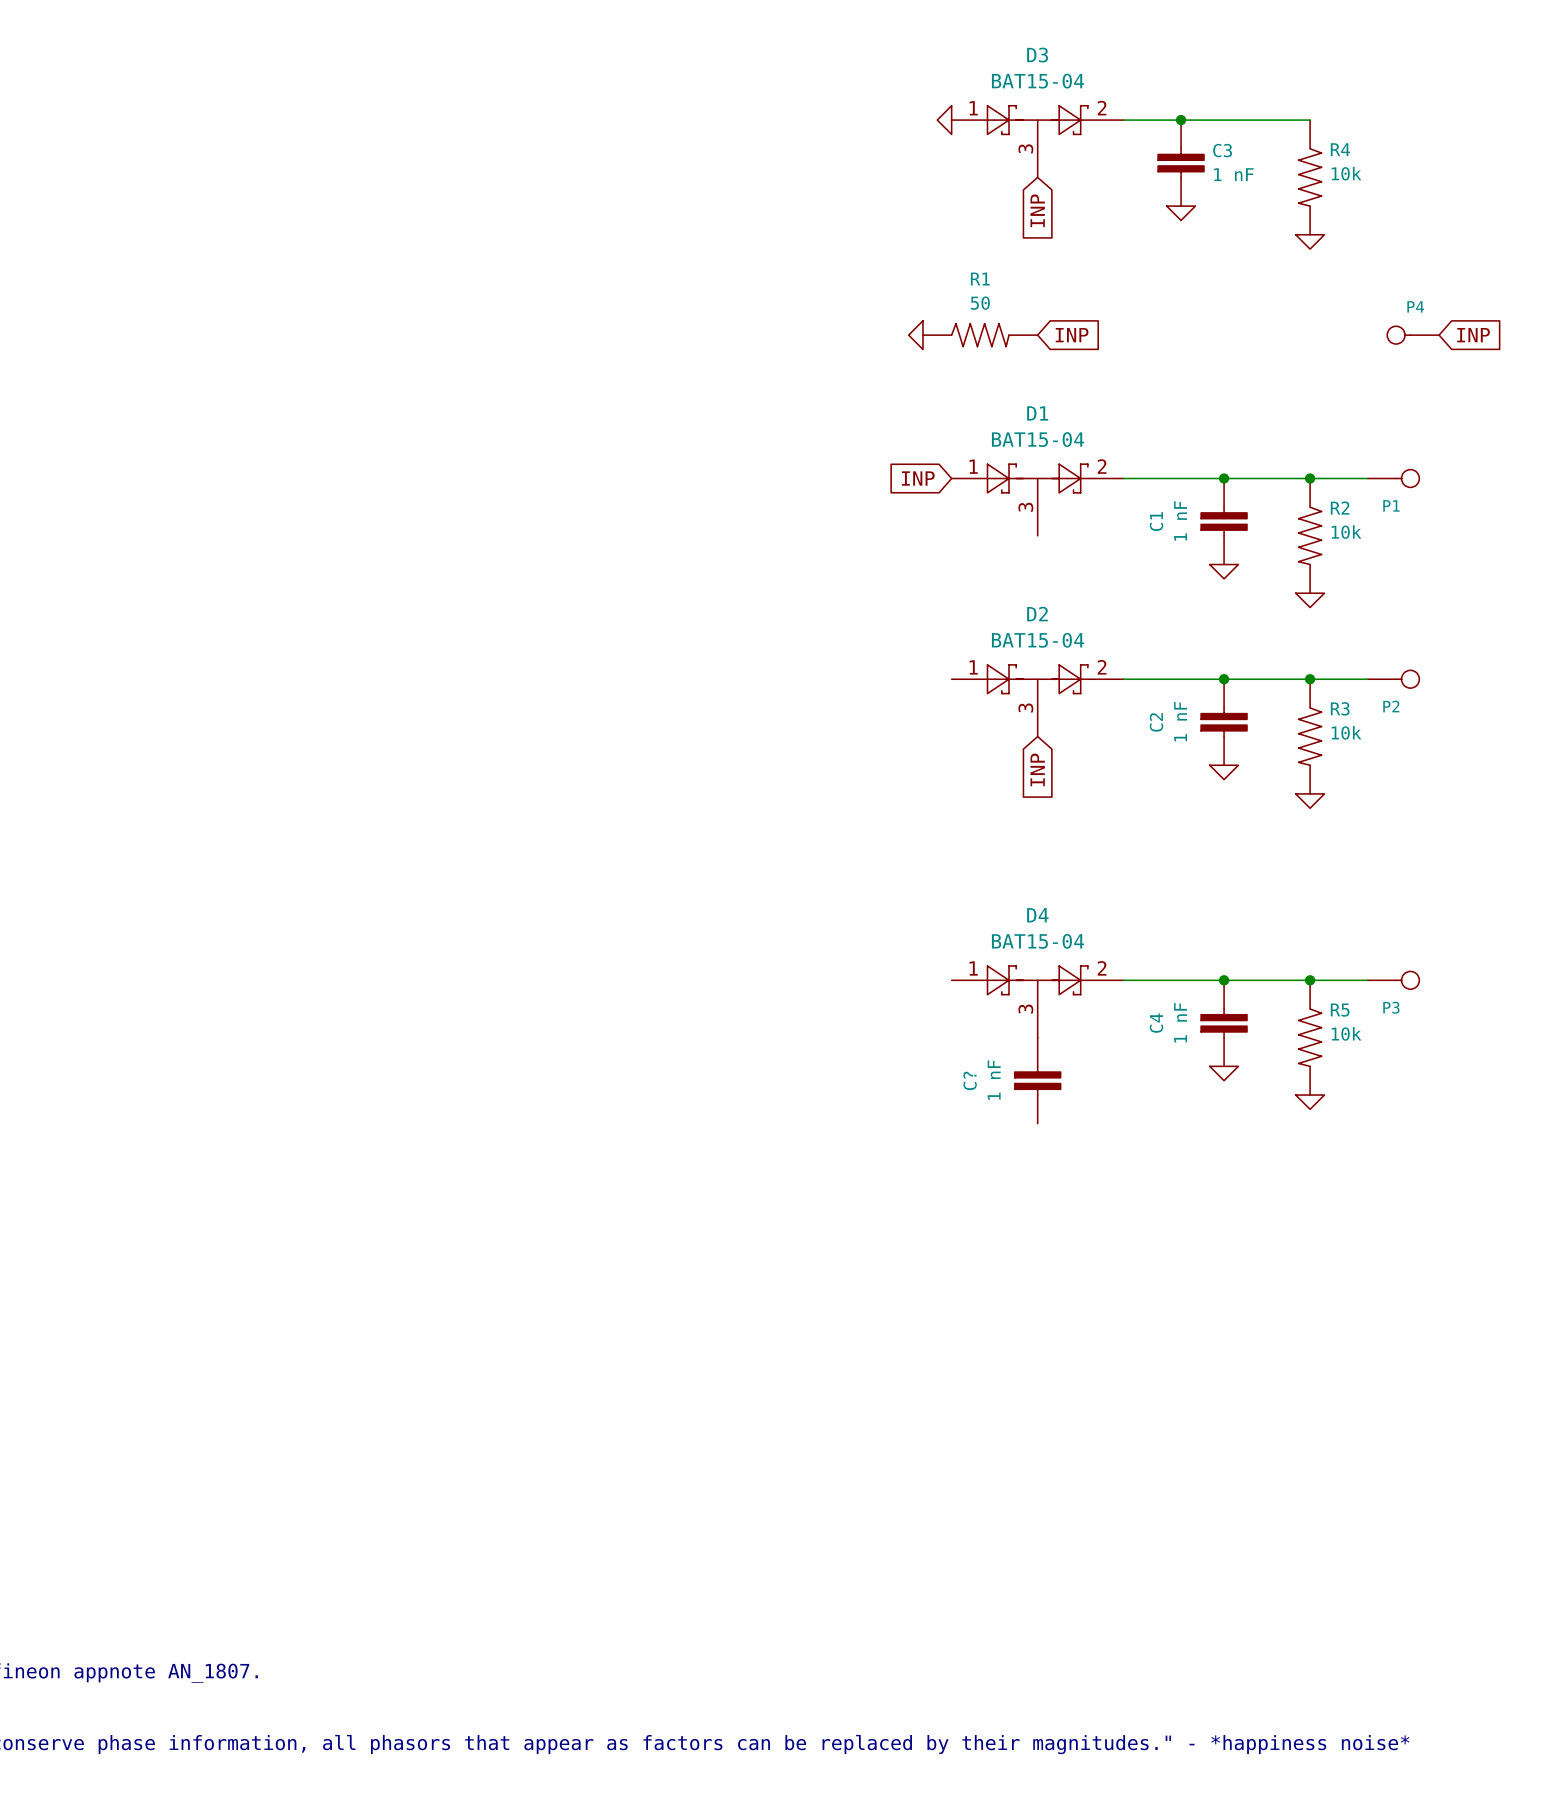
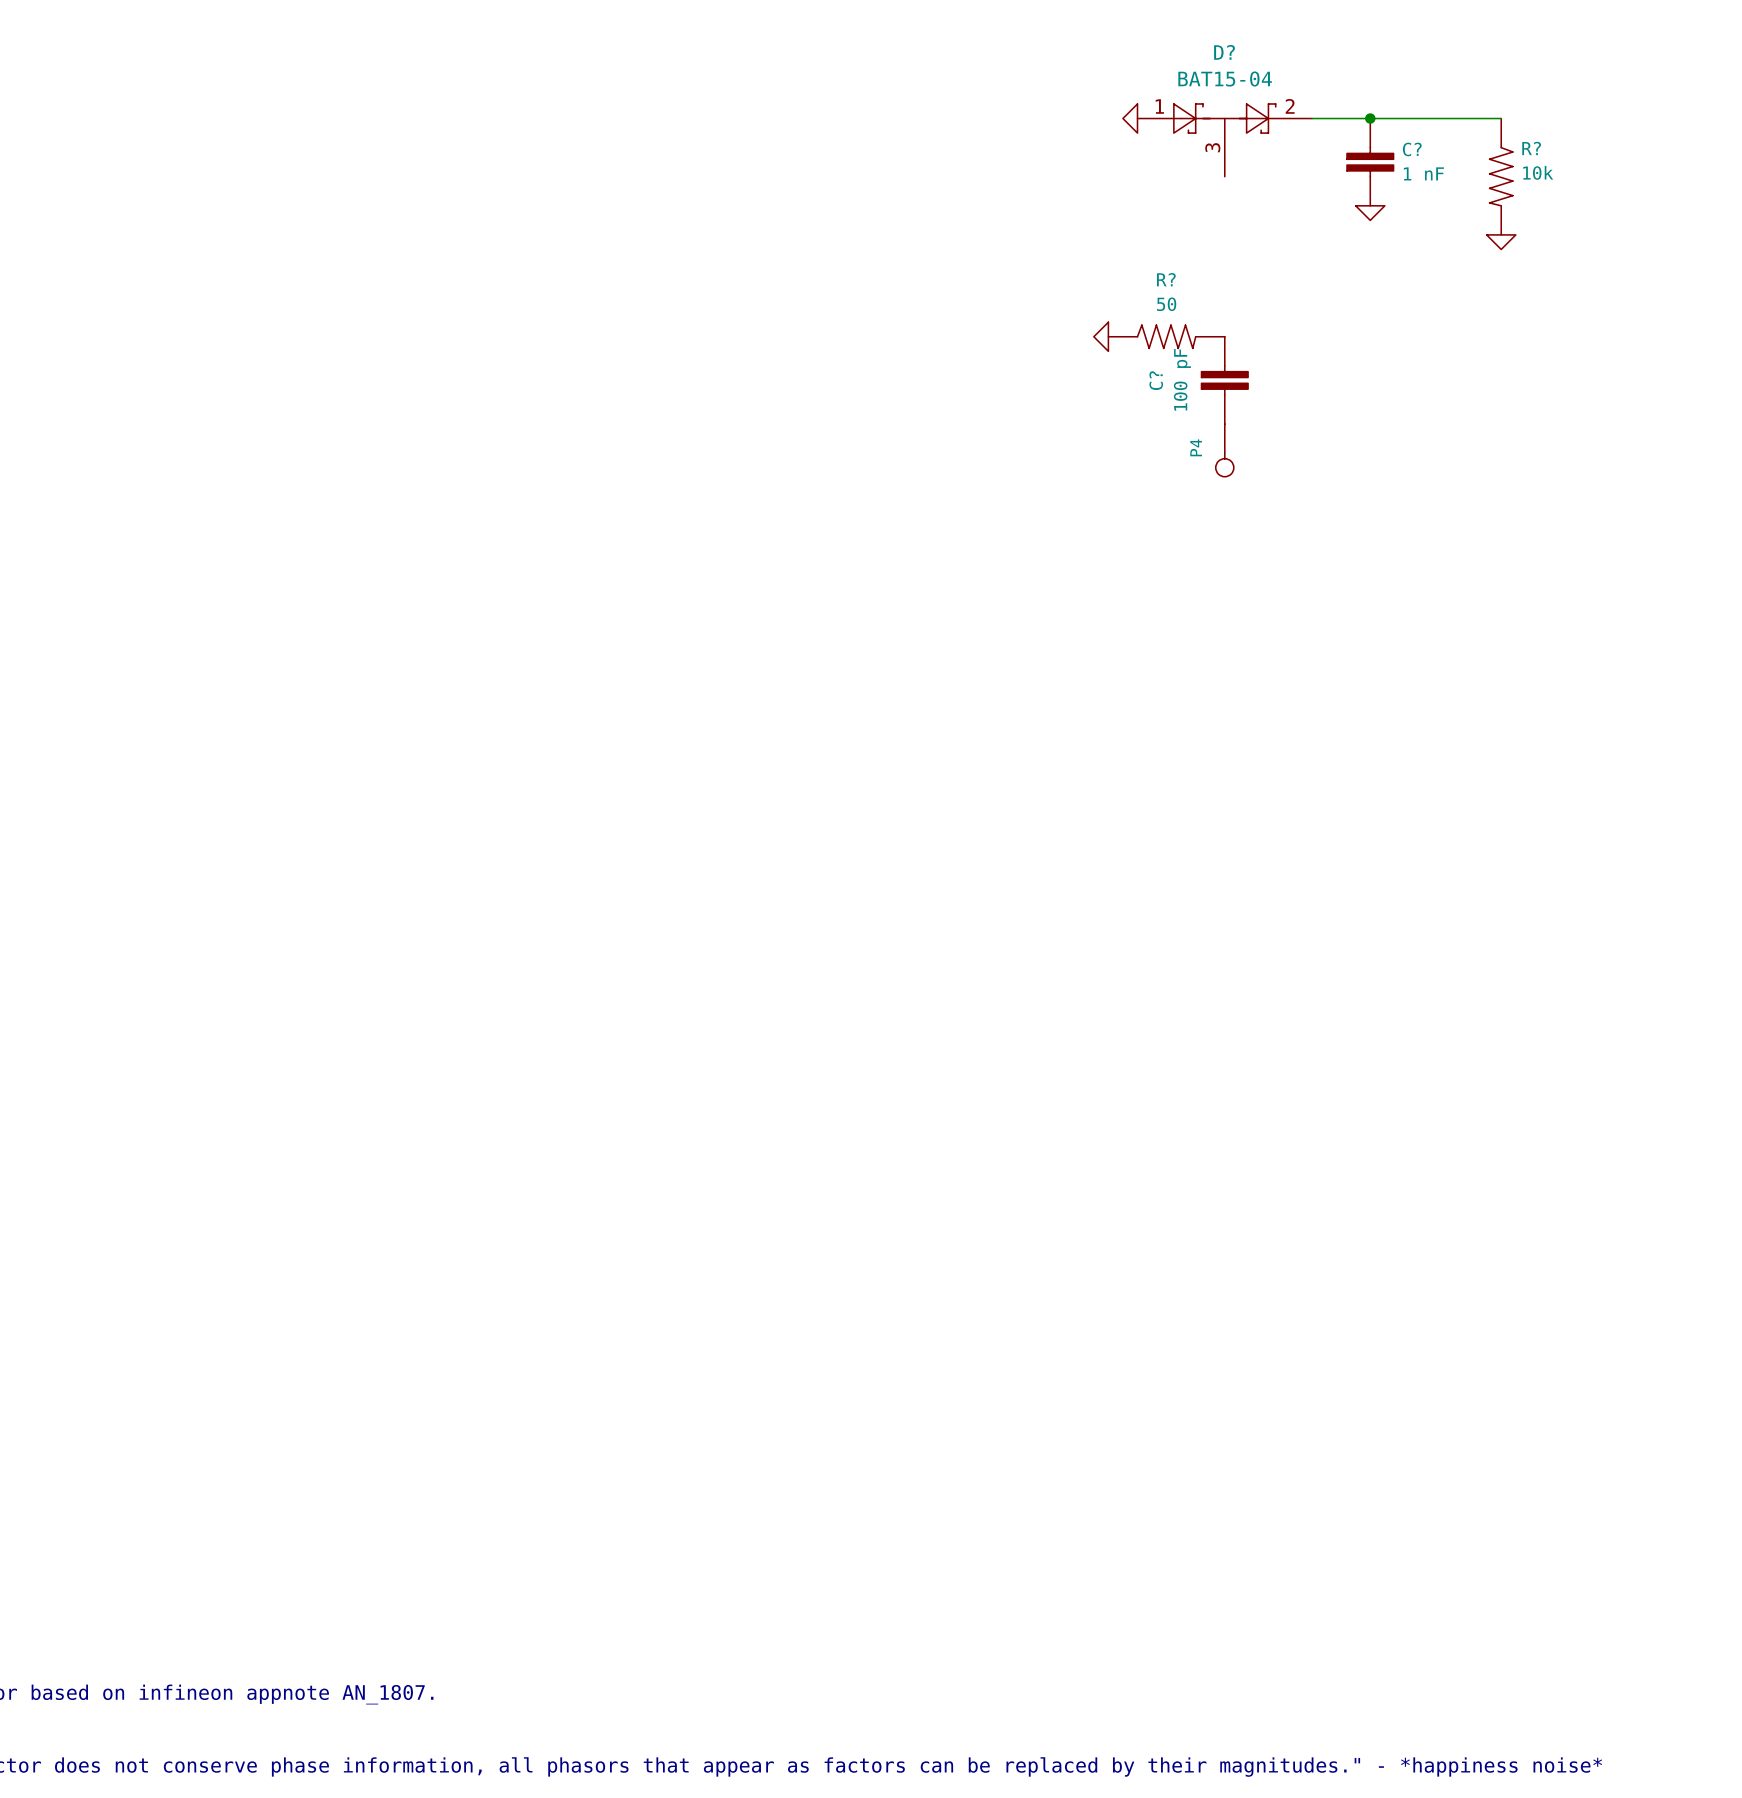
D3 name: D3 (1037, 55) -> D? (1224, 52)
R4 name: R4 (1340, 149) -> R? (1531, 148)
C3 name: C3 (1222, 150) -> C? (1412, 149)
global label: INP (1037, 210) -> none
R1 name: R1 (980, 279) -> R? (1166, 279)
global label: INP (1072, 335) -> none
P4 rotation: 0° (1398, 335) -> 90° counterclockwise (1224, 464)
P4 position: (1413, 335) -> (1224, 450)
global label: INP (1473, 335) -> none
C?: none -> 100 pF (1224, 380)
global label: INP (918, 478) -> none
wire: (1123, 478) (1367, 478) -> none
junction: (1224, 478) -> none
junction: (1310, 478) -> none
P1: (1393, 478) -> none
D1: BAT15-04 (1037, 500) -> none
C1: 1 nF (1224, 521) -> none
R2: 10k (1310, 535) -> none
power symbol: (1224, 571) -> none
power symbol: (1310, 600) -> none
wire: (1123, 679) (1367, 679) -> none
junction: (1224, 679) -> none
junction: (1310, 679) -> none
P2: (1393, 679) -> none
D2: BAT15-04 (1037, 700) -> none
C2: 1 nF (1224, 722) -> none
R3: 10k (1310, 736) -> none
global label: INP (1037, 769) -> none
power symbol: (1224, 772) -> none
power symbol: (1310, 801) -> none
wire: (1123, 980) (1367, 980) -> none
junction: (1224, 980) -> none
junction: (1310, 980) -> none
P3: (1393, 980) -> none
D4: BAT15-04 (1037, 1001) -> none
C4: 1 nF (1224, 1023) -> none
R5: 10k (1310, 1037) -> none
power symbol: (1224, 1073) -> none
C?: 1 nF (1037, 1080) -> none
power symbol: (1310, 1102) -> none

